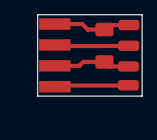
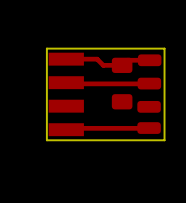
top track: (54, 65) (79, 65) (83, 61) (104, 61) (108, 66) (128, 66) -> none

